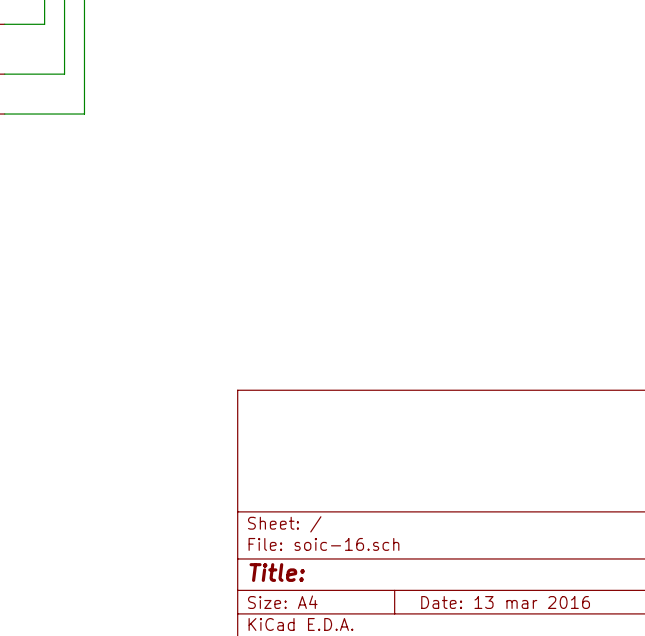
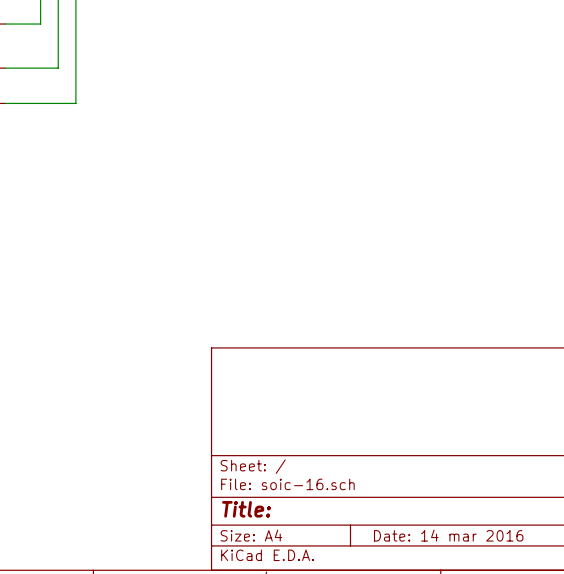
title block: Date: 13 mar 2016 (505, 602) -> Date: 14 mar 2016 (448, 535)

